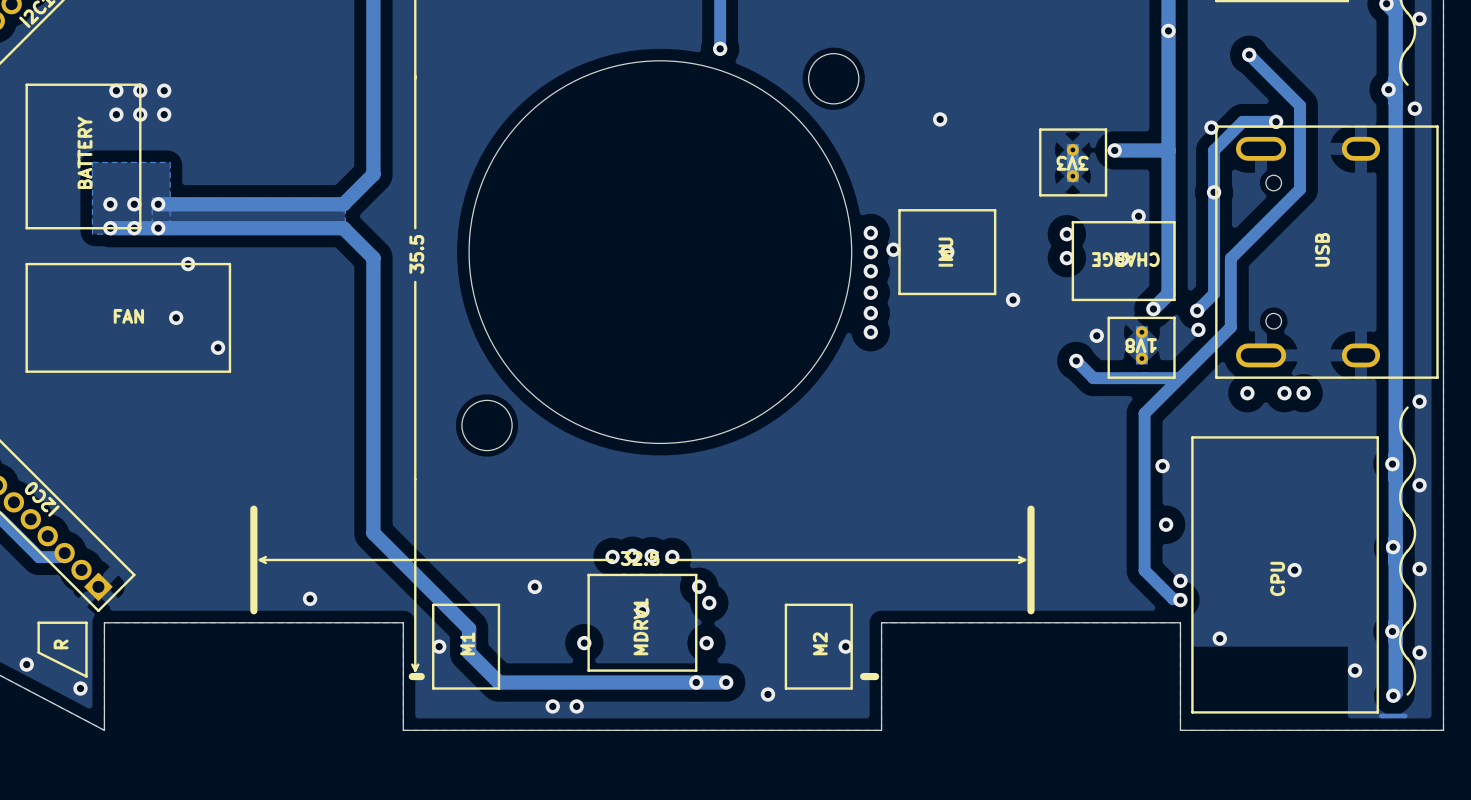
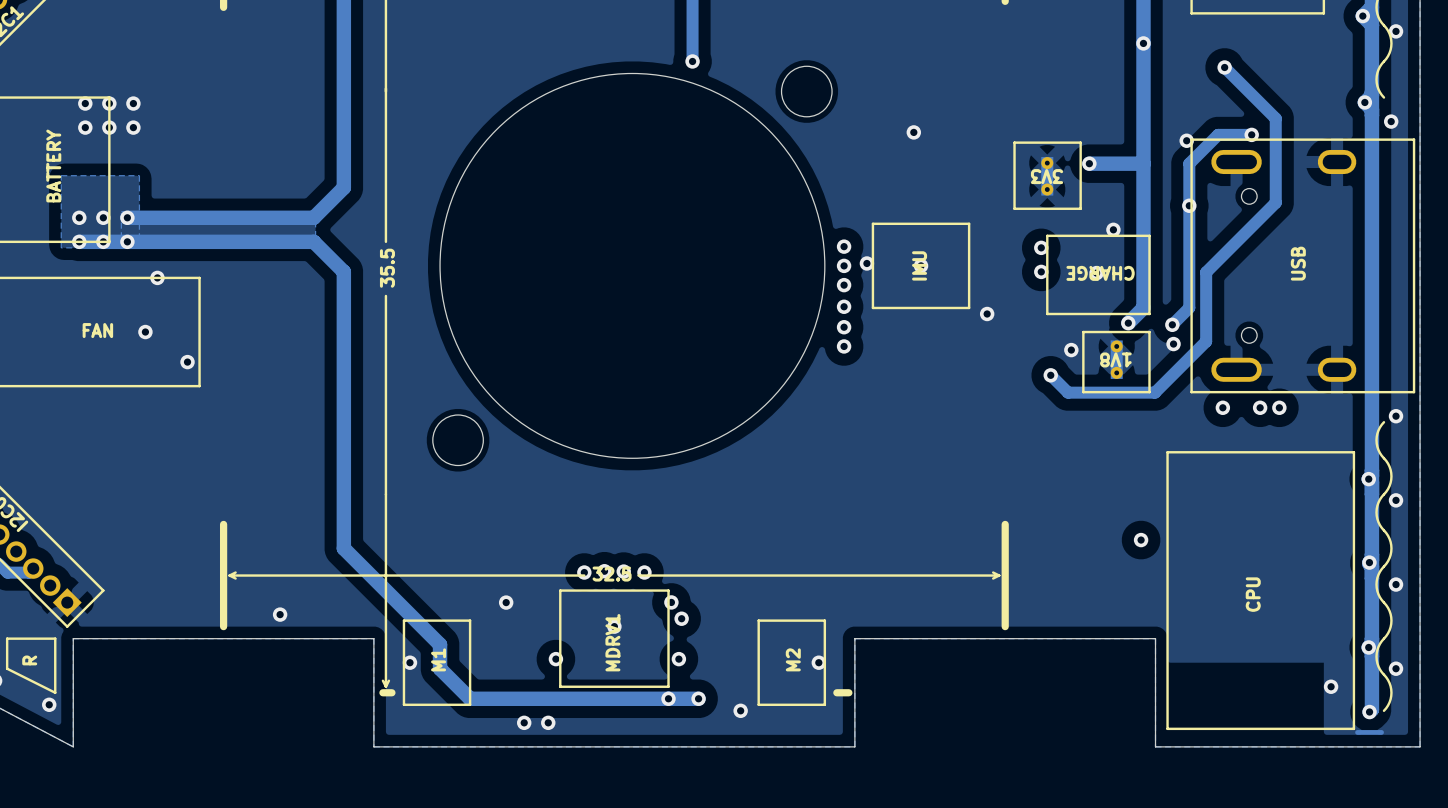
track: (1179, 378) (1144, 413) (1144, 570) (1173, 599) (1180, 600) -> none
via: (1162, 466) -> none
via: (1294, 570) -> none
via: (1180, 580) -> none
via: (1180, 600) -> none
via: (1219, 638) -> none

